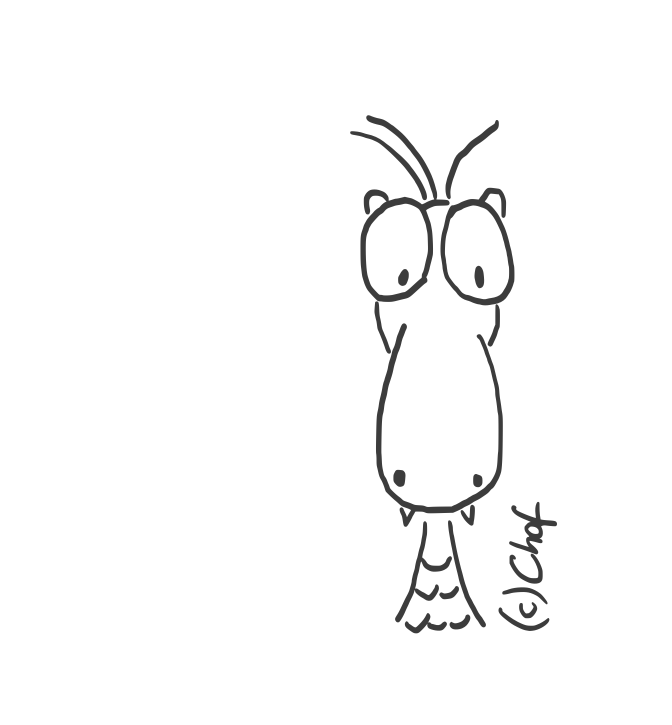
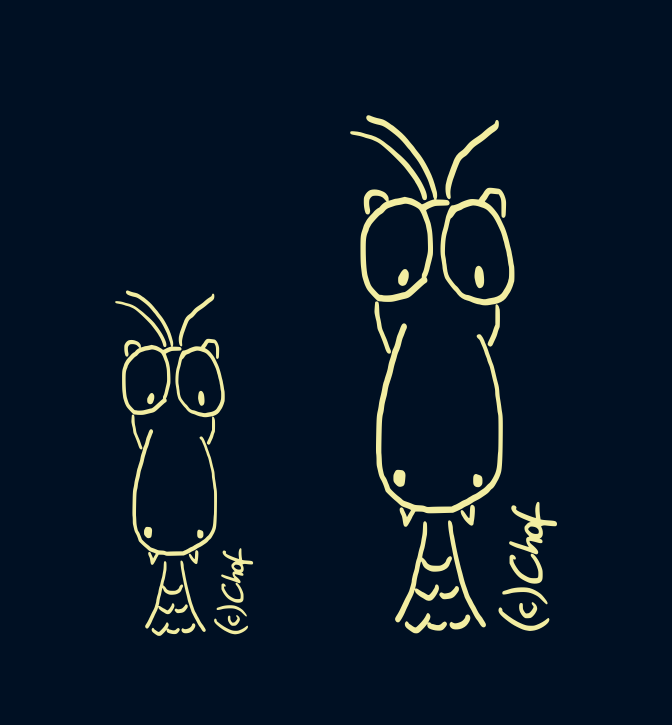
drawing: none -> [115, 290, 254, 636]

